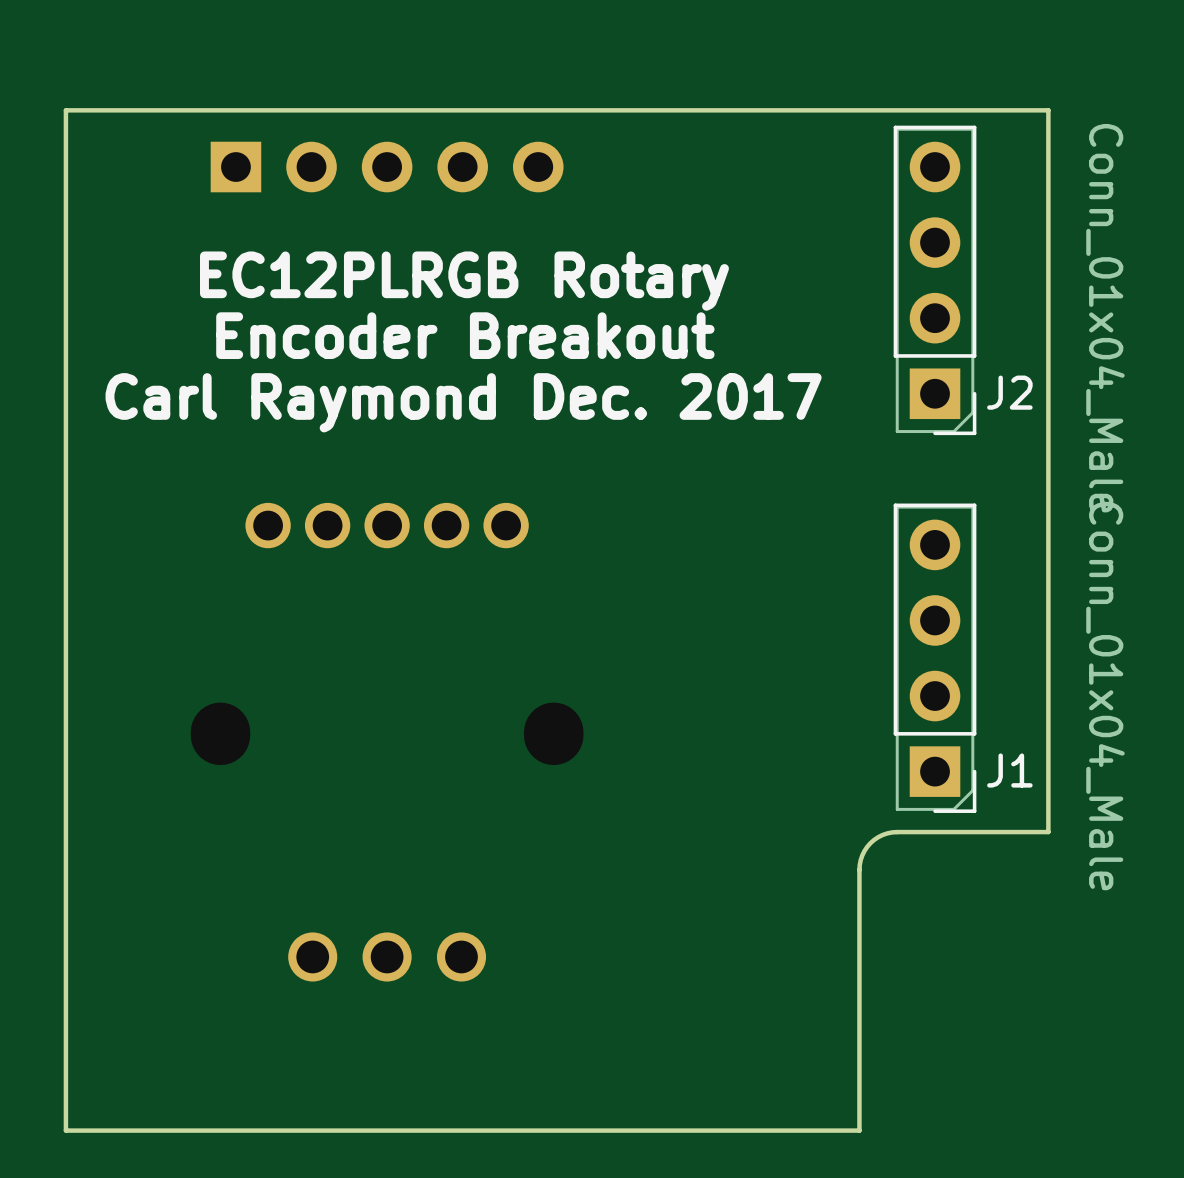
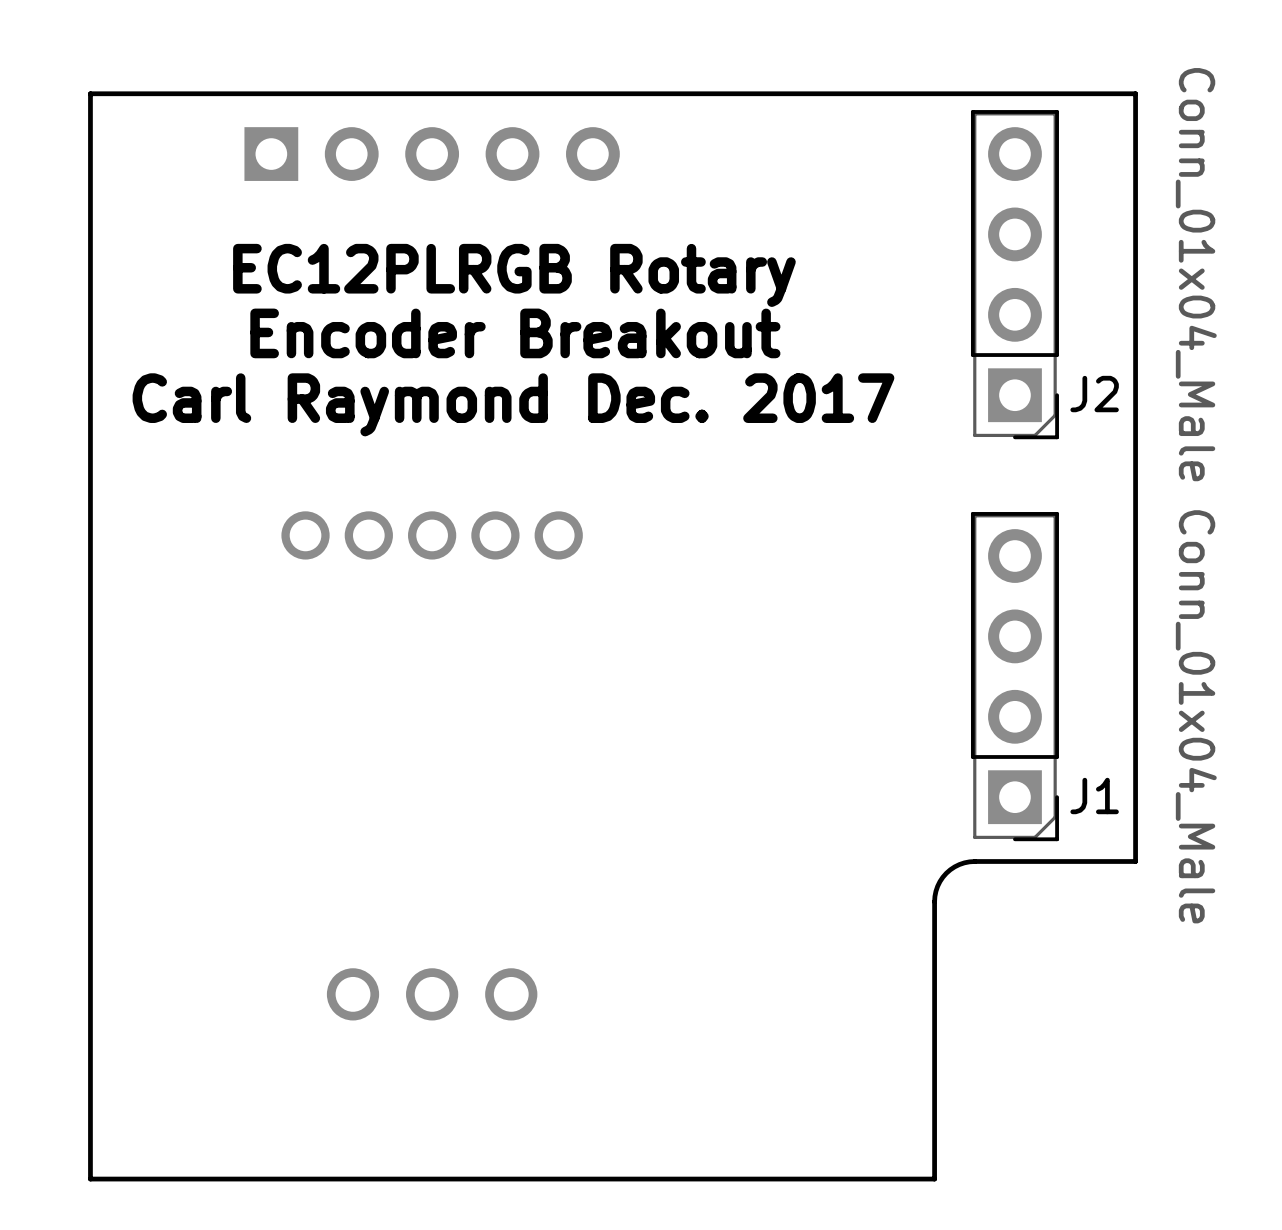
J2 value position: Conn_01x04_Male (1105, 318) -> Conn_01x04_Male (1196, 274)

